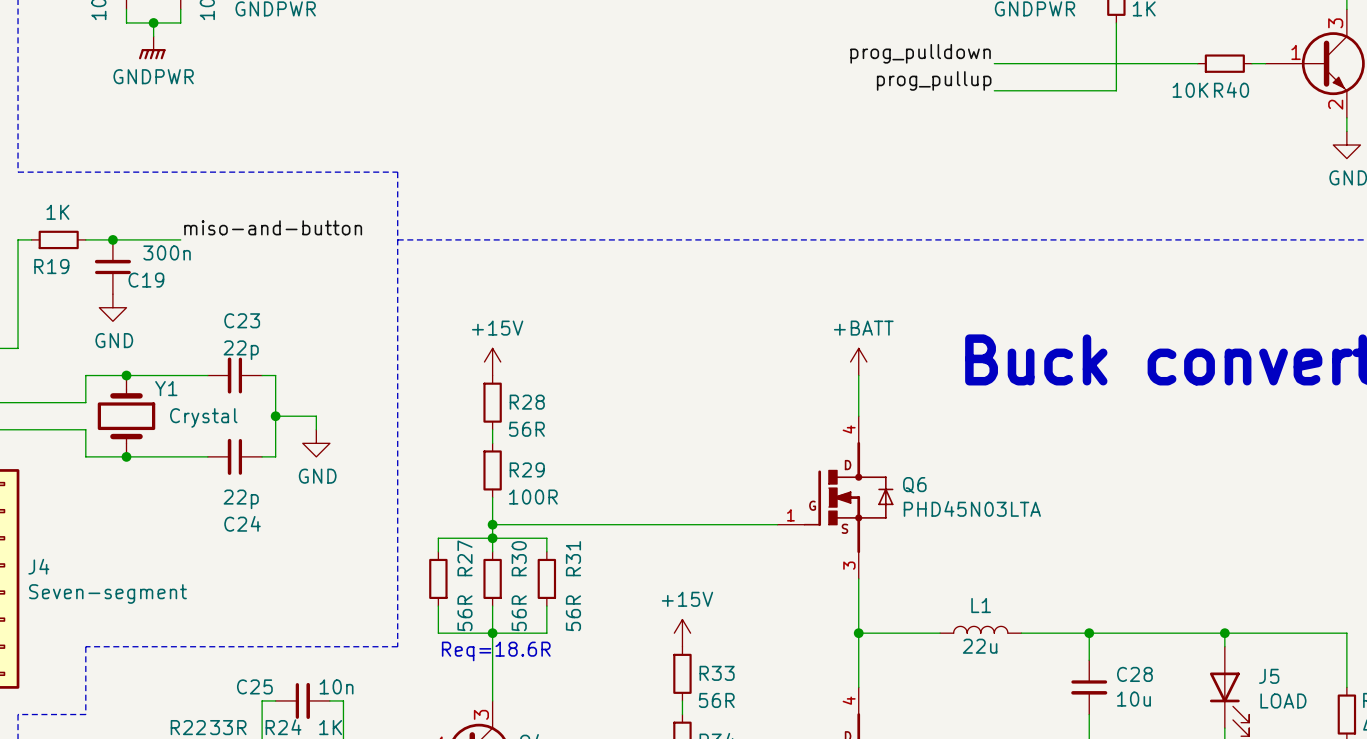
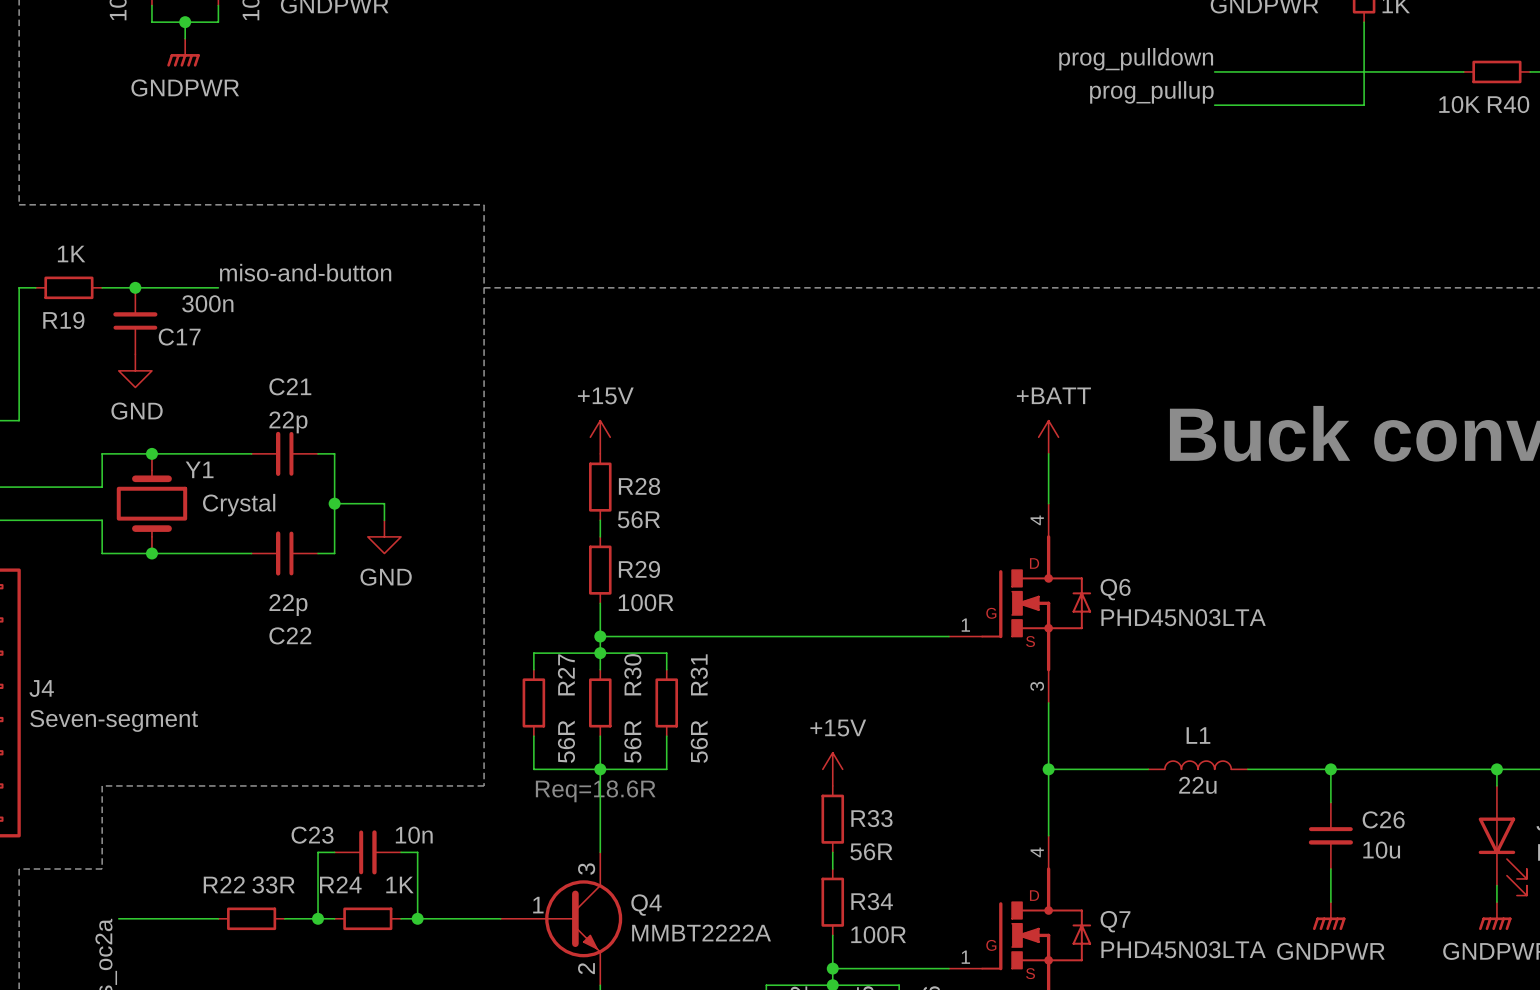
C19 name: C19 (146, 280) -> C17 (179, 337)
C23 name: C23 (242, 320) -> C21 (290, 386)
C24 name: C24 (242, 523) -> C22 (290, 635)
C28 name: C28 (1134, 674) -> C26 (1383, 819)
C25 name: C25 (254, 686) -> C23 (312, 835)

